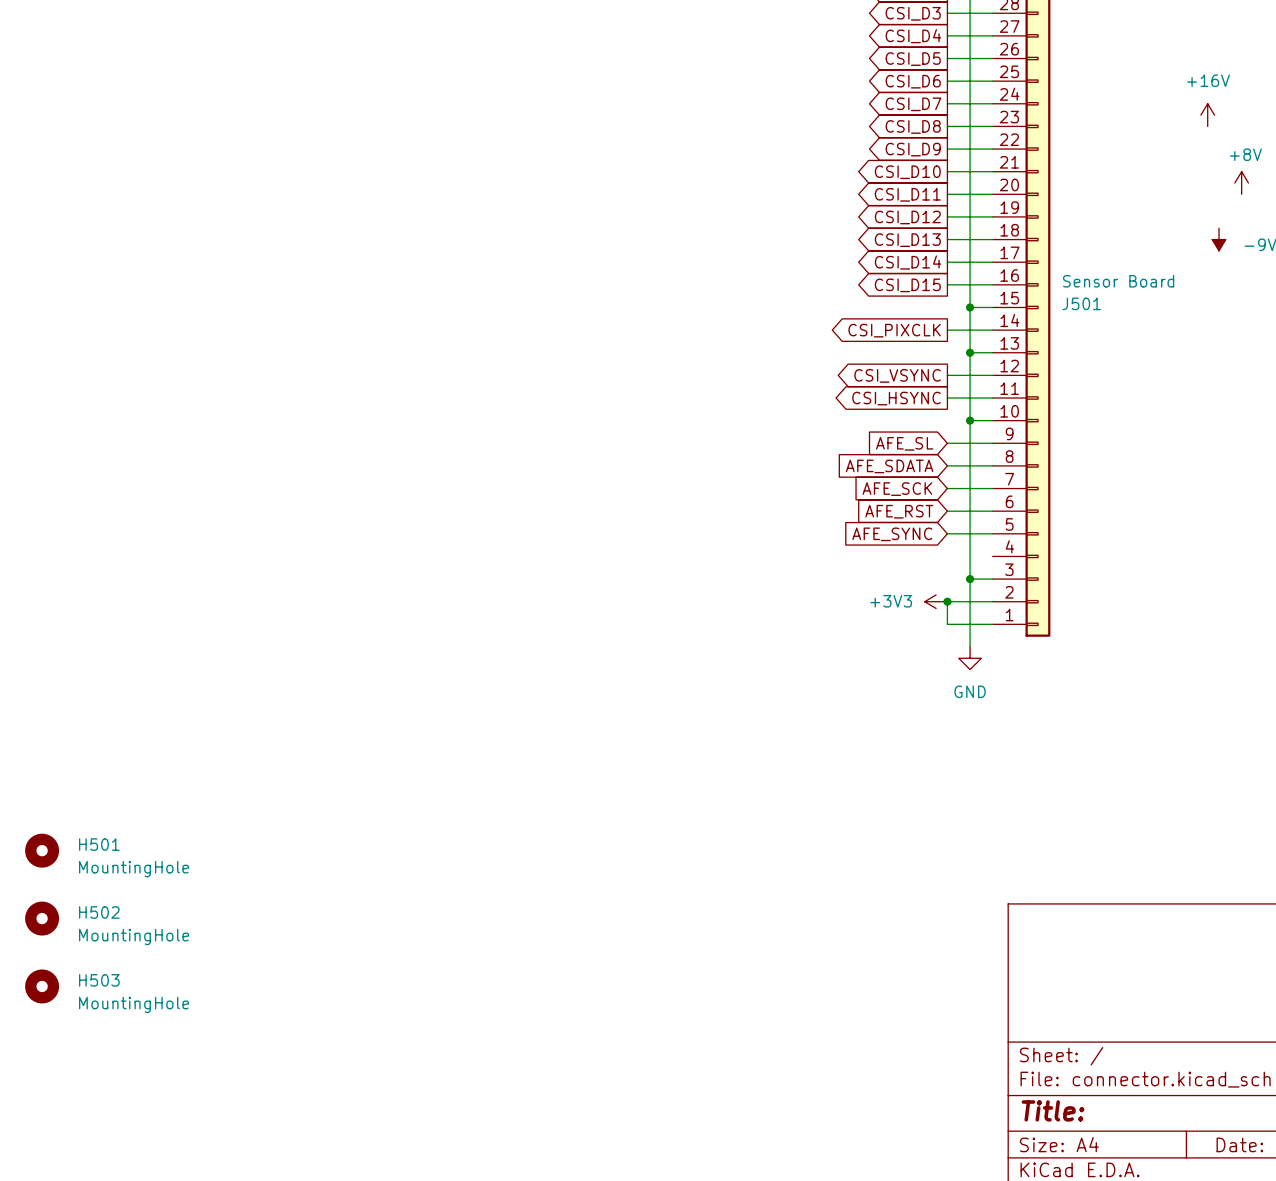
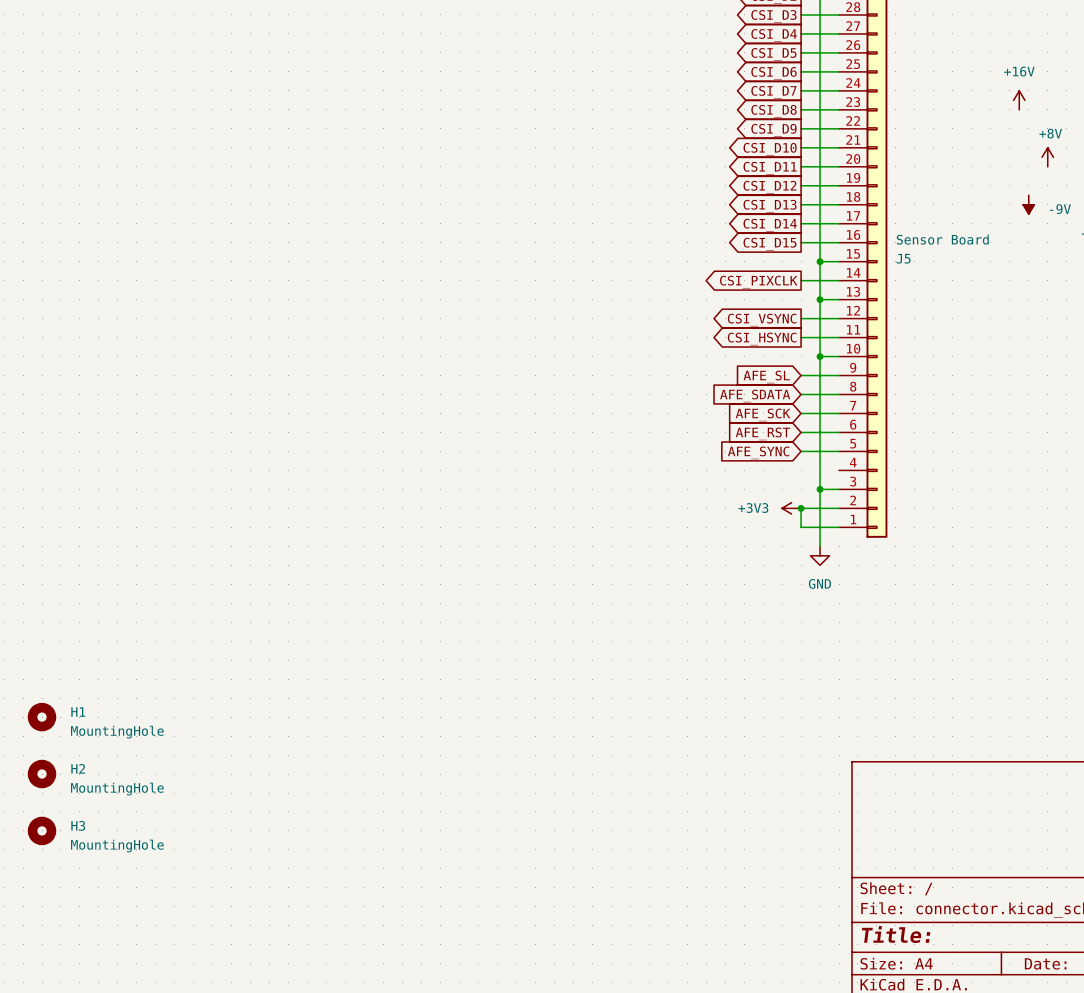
J501 name: J501 (1081, 303) -> J5 (903, 258)
H501 name: H501 (99, 844) -> H1 (78, 712)
H502 name: H502 (99, 912) -> H2 (78, 768)
H503 name: H503 (99, 980) -> H3 (78, 825)

